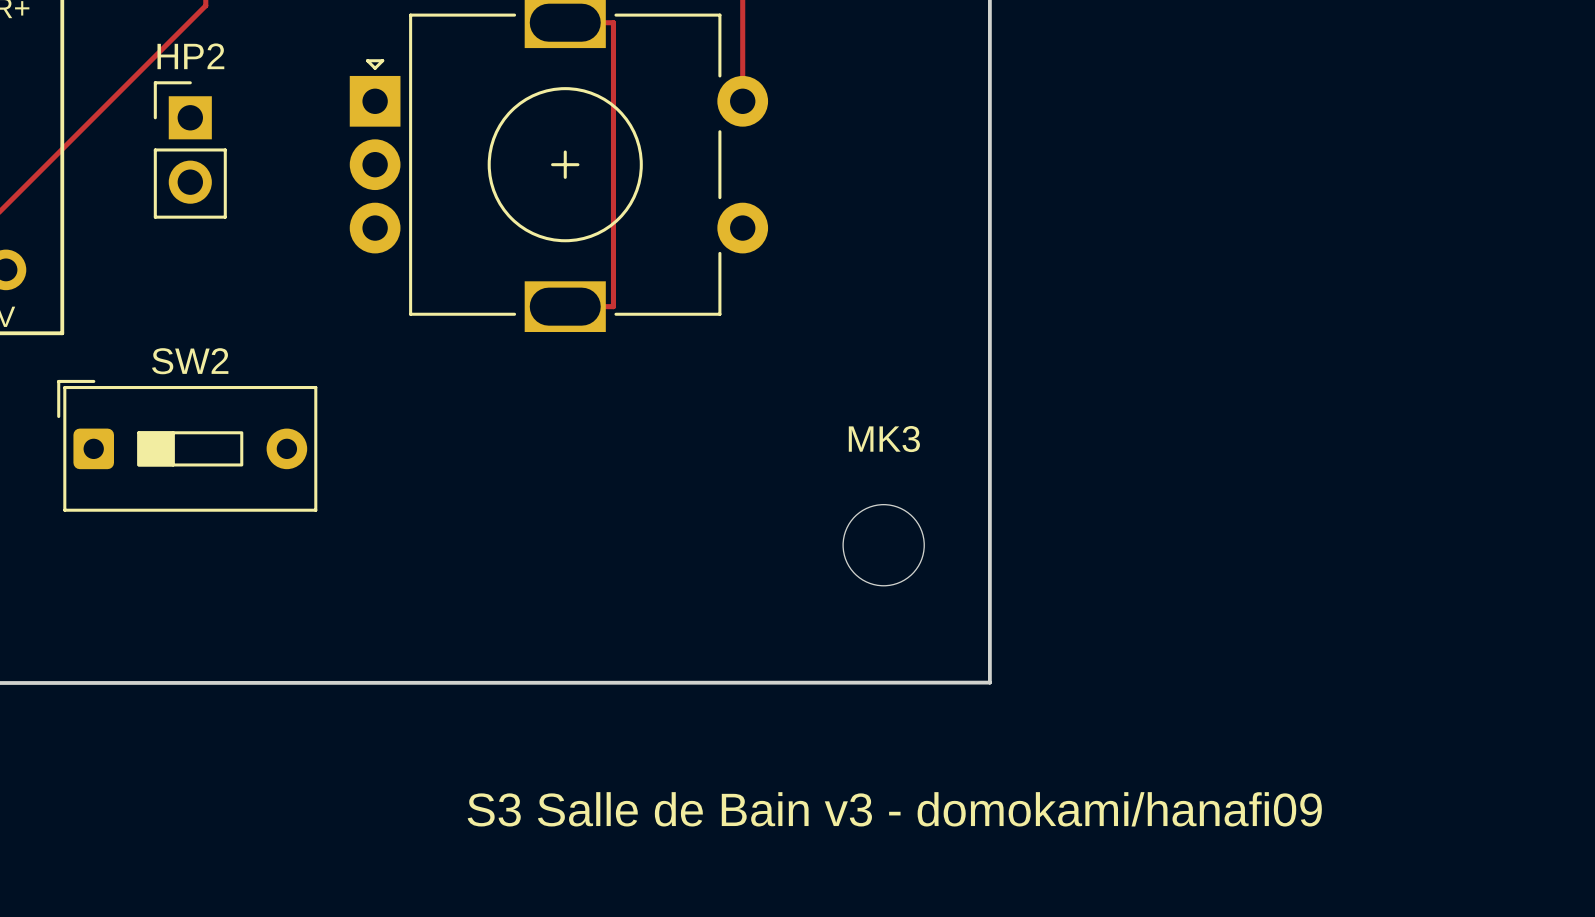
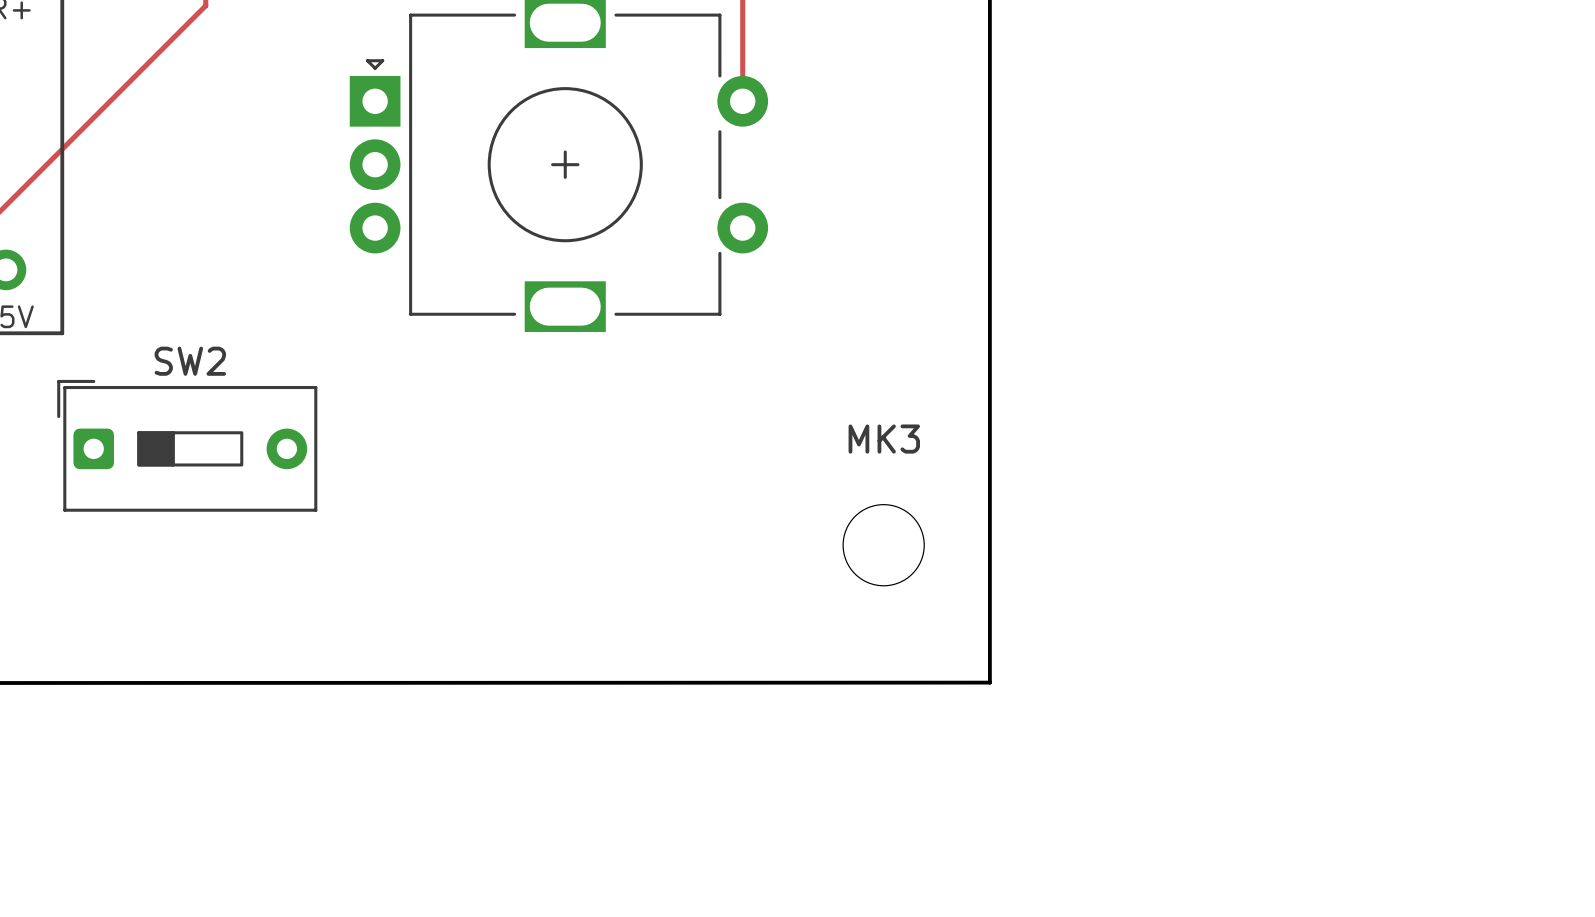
track: (565, 22) (613, 22) (613, 306) (565, 306) -> none
HP2: (190, 149) -> none
text: S3 Salle de Bain v3 - domokami/hanafi09 (894, 809) -> none

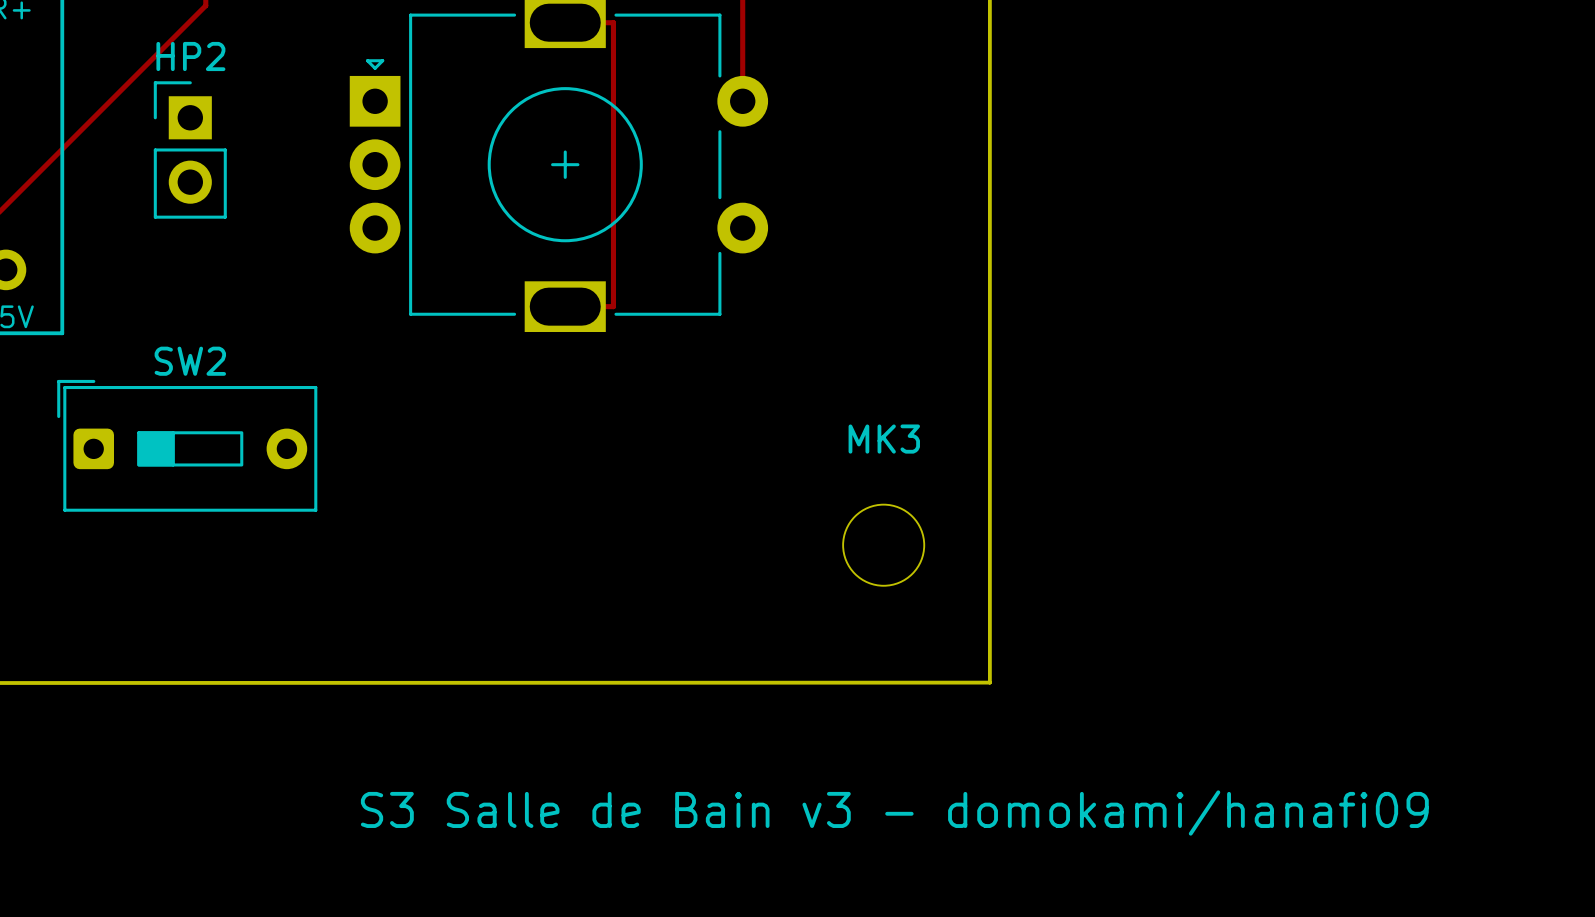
track: none -> (565, 22) (613, 22) (613, 306) (565, 306)
HP2: none -> (190, 149)
text: none -> S3 Salle de Bain v3 - domokami/hanafi09 (894, 813)

